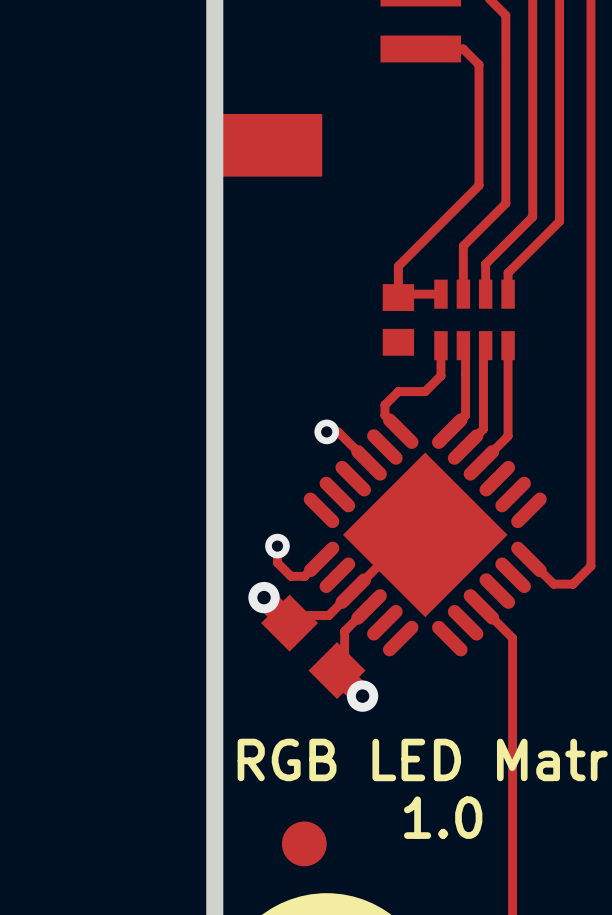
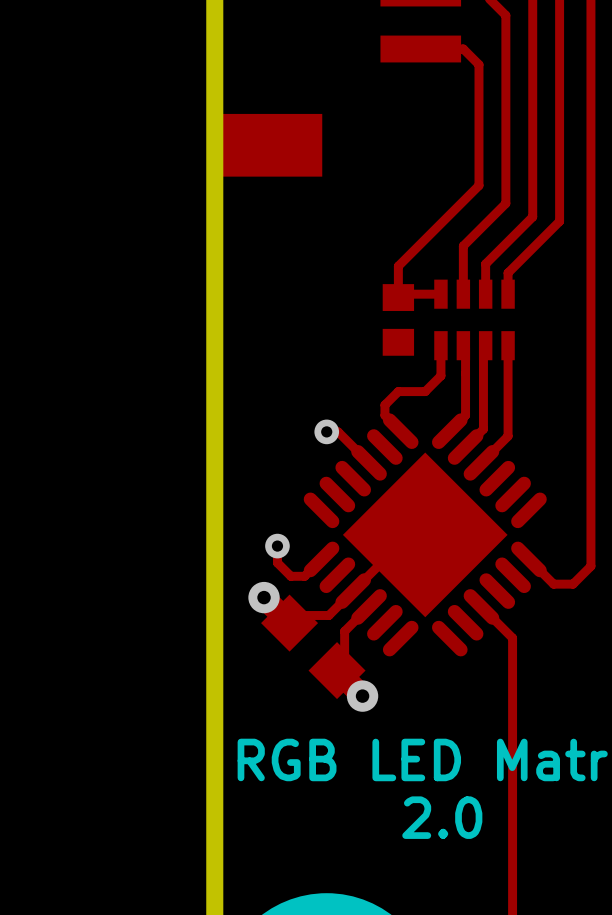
text: 1.0 (443, 817) -> 2.0 (442, 817)
part: (304, 843) -> none

